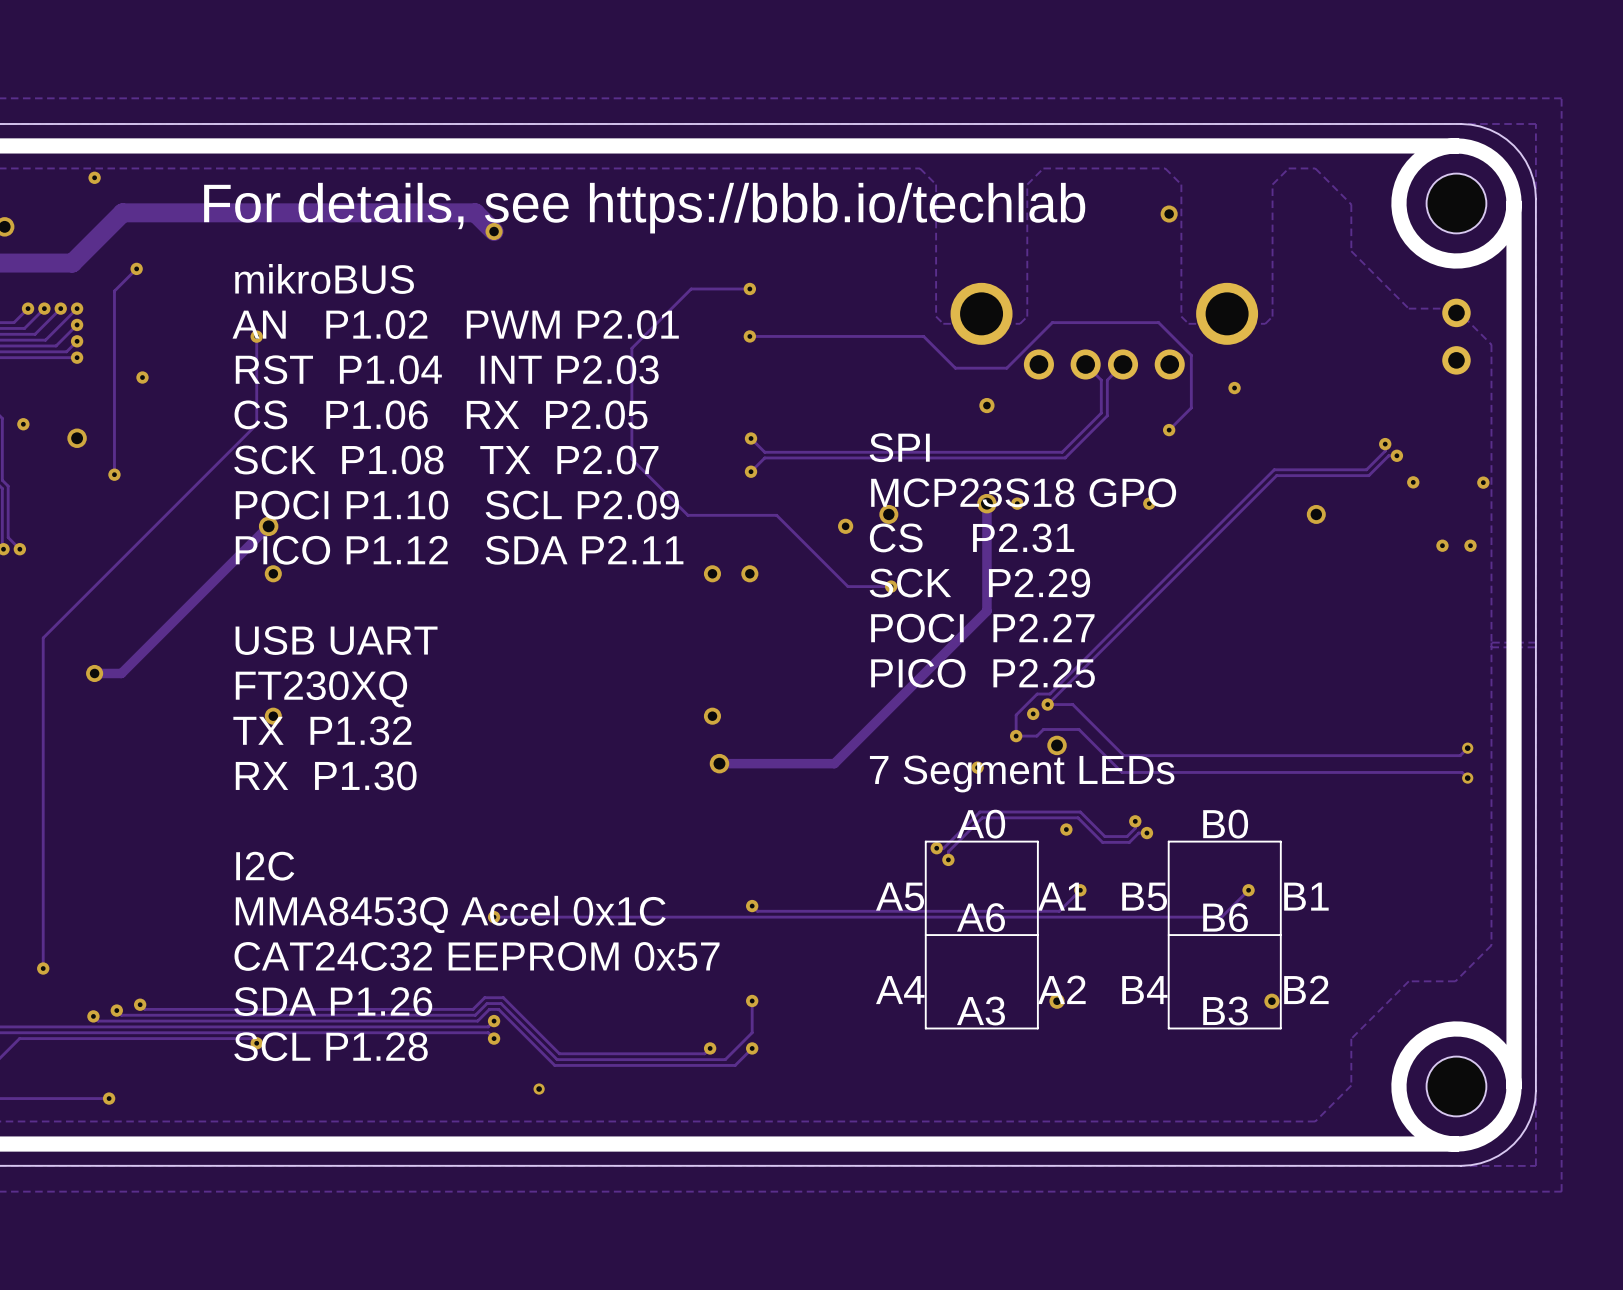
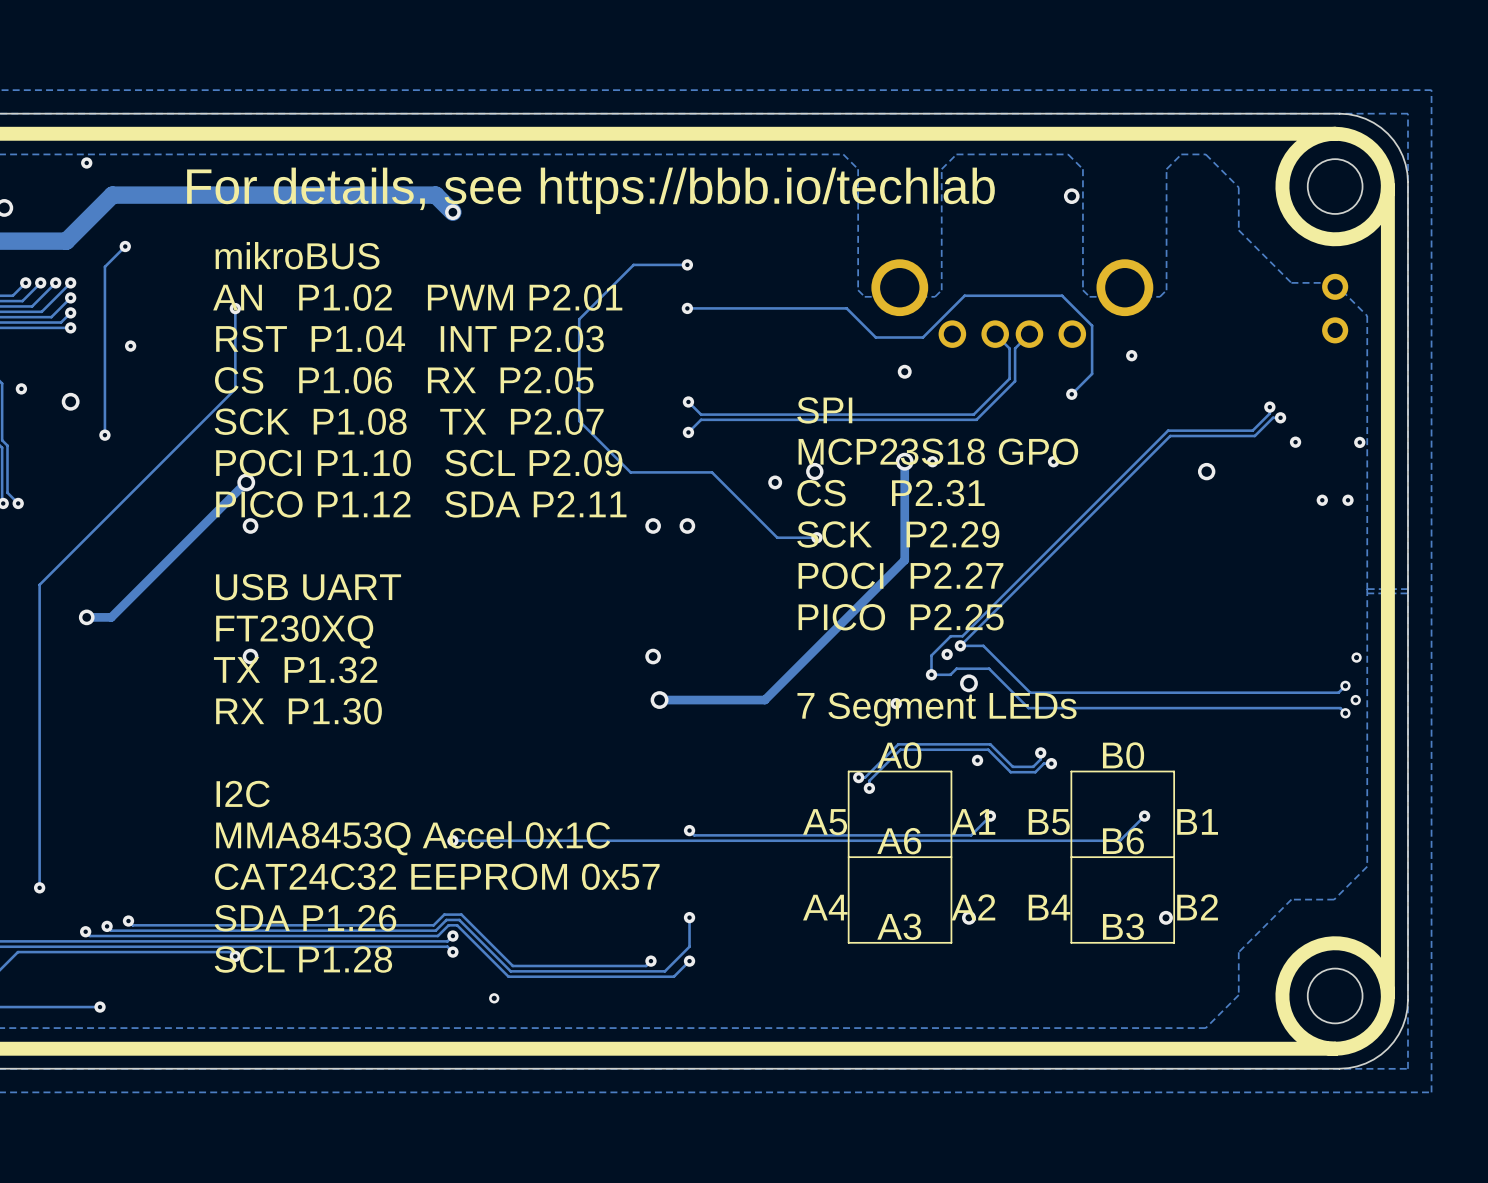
via: none -> (1356, 657)
via: none -> (1355, 700)

